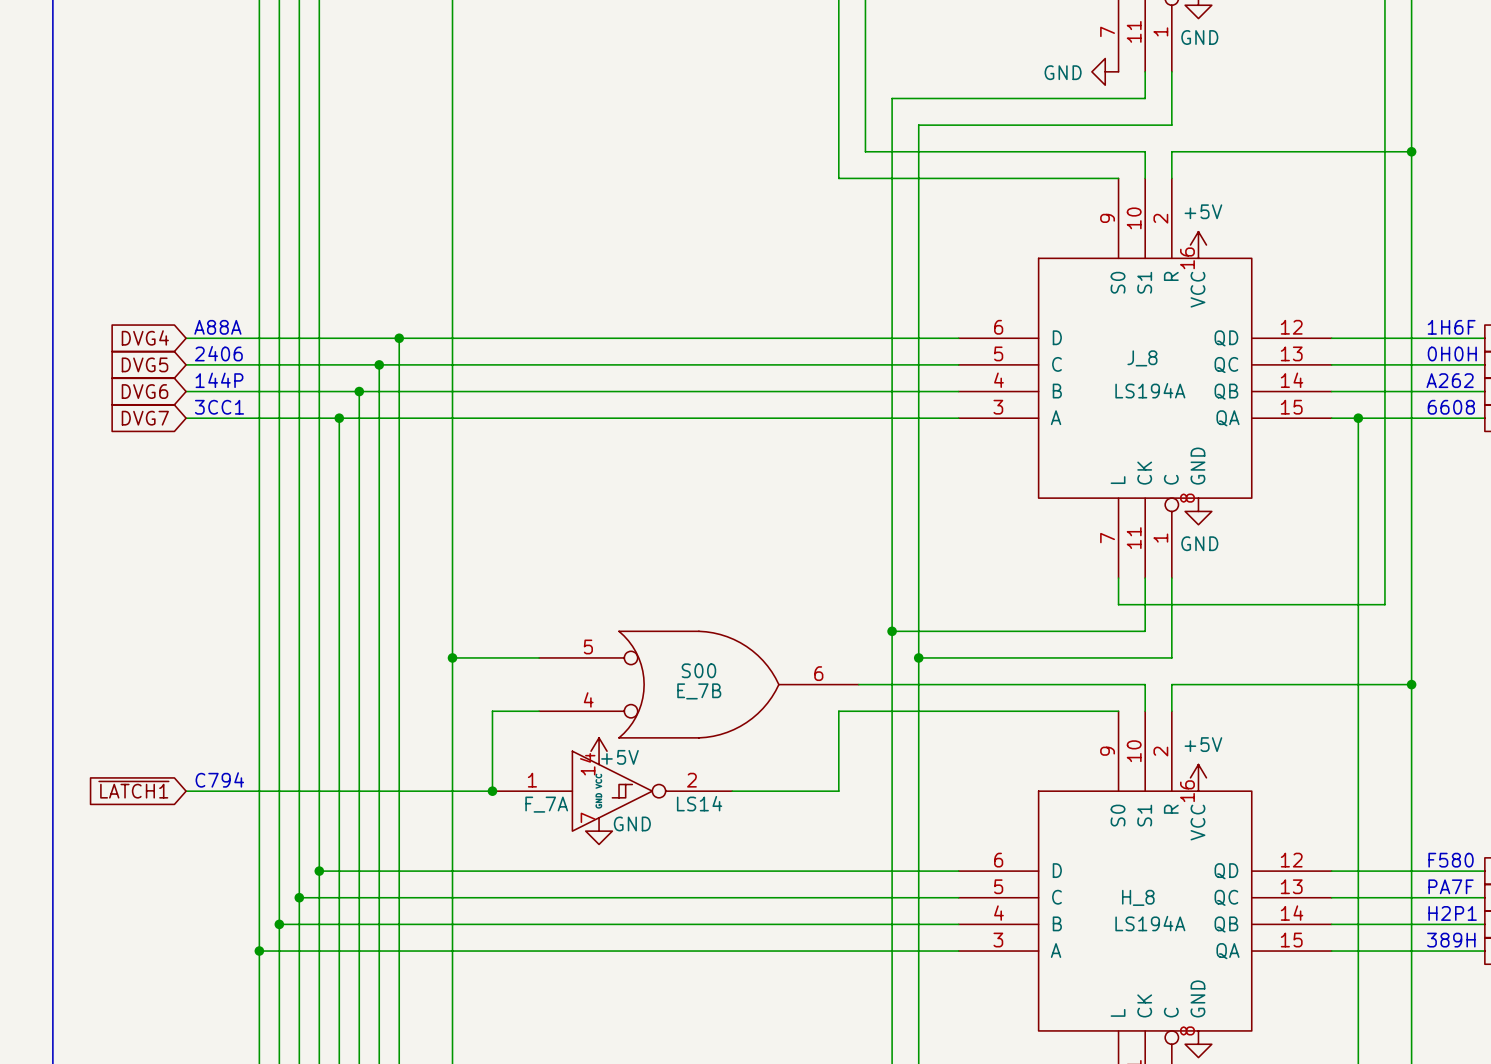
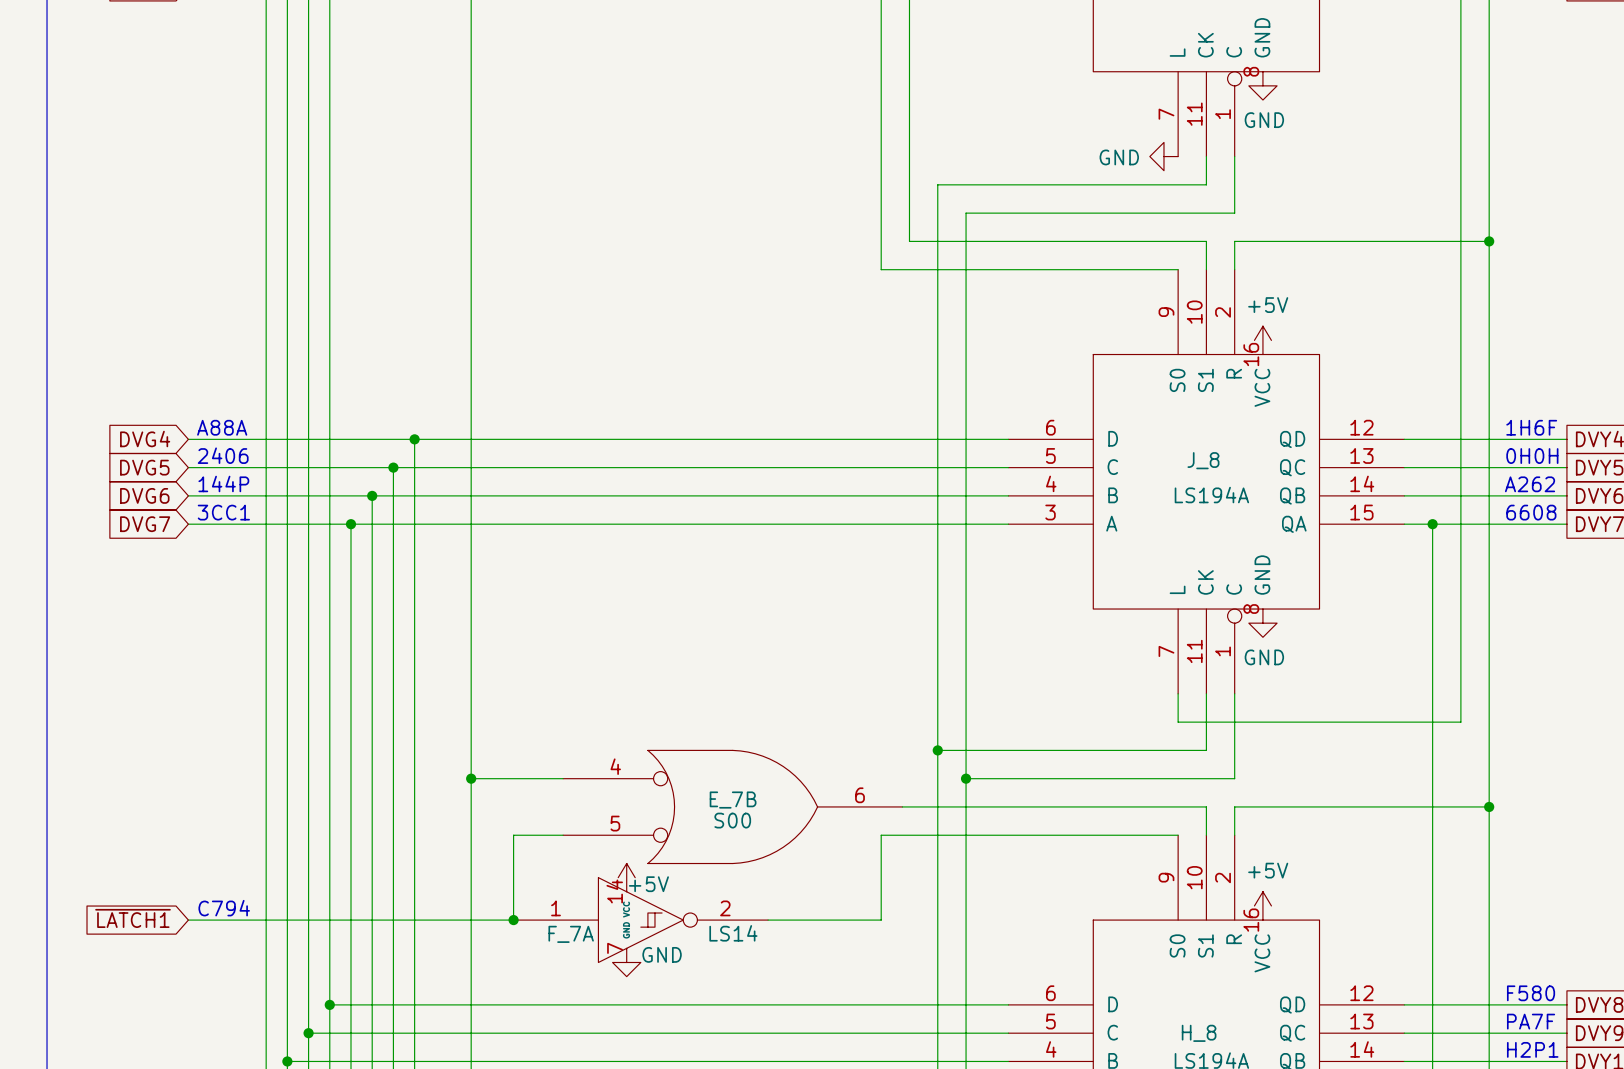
E_7B flip: as is (698, 684) -> up-down (732, 806)

